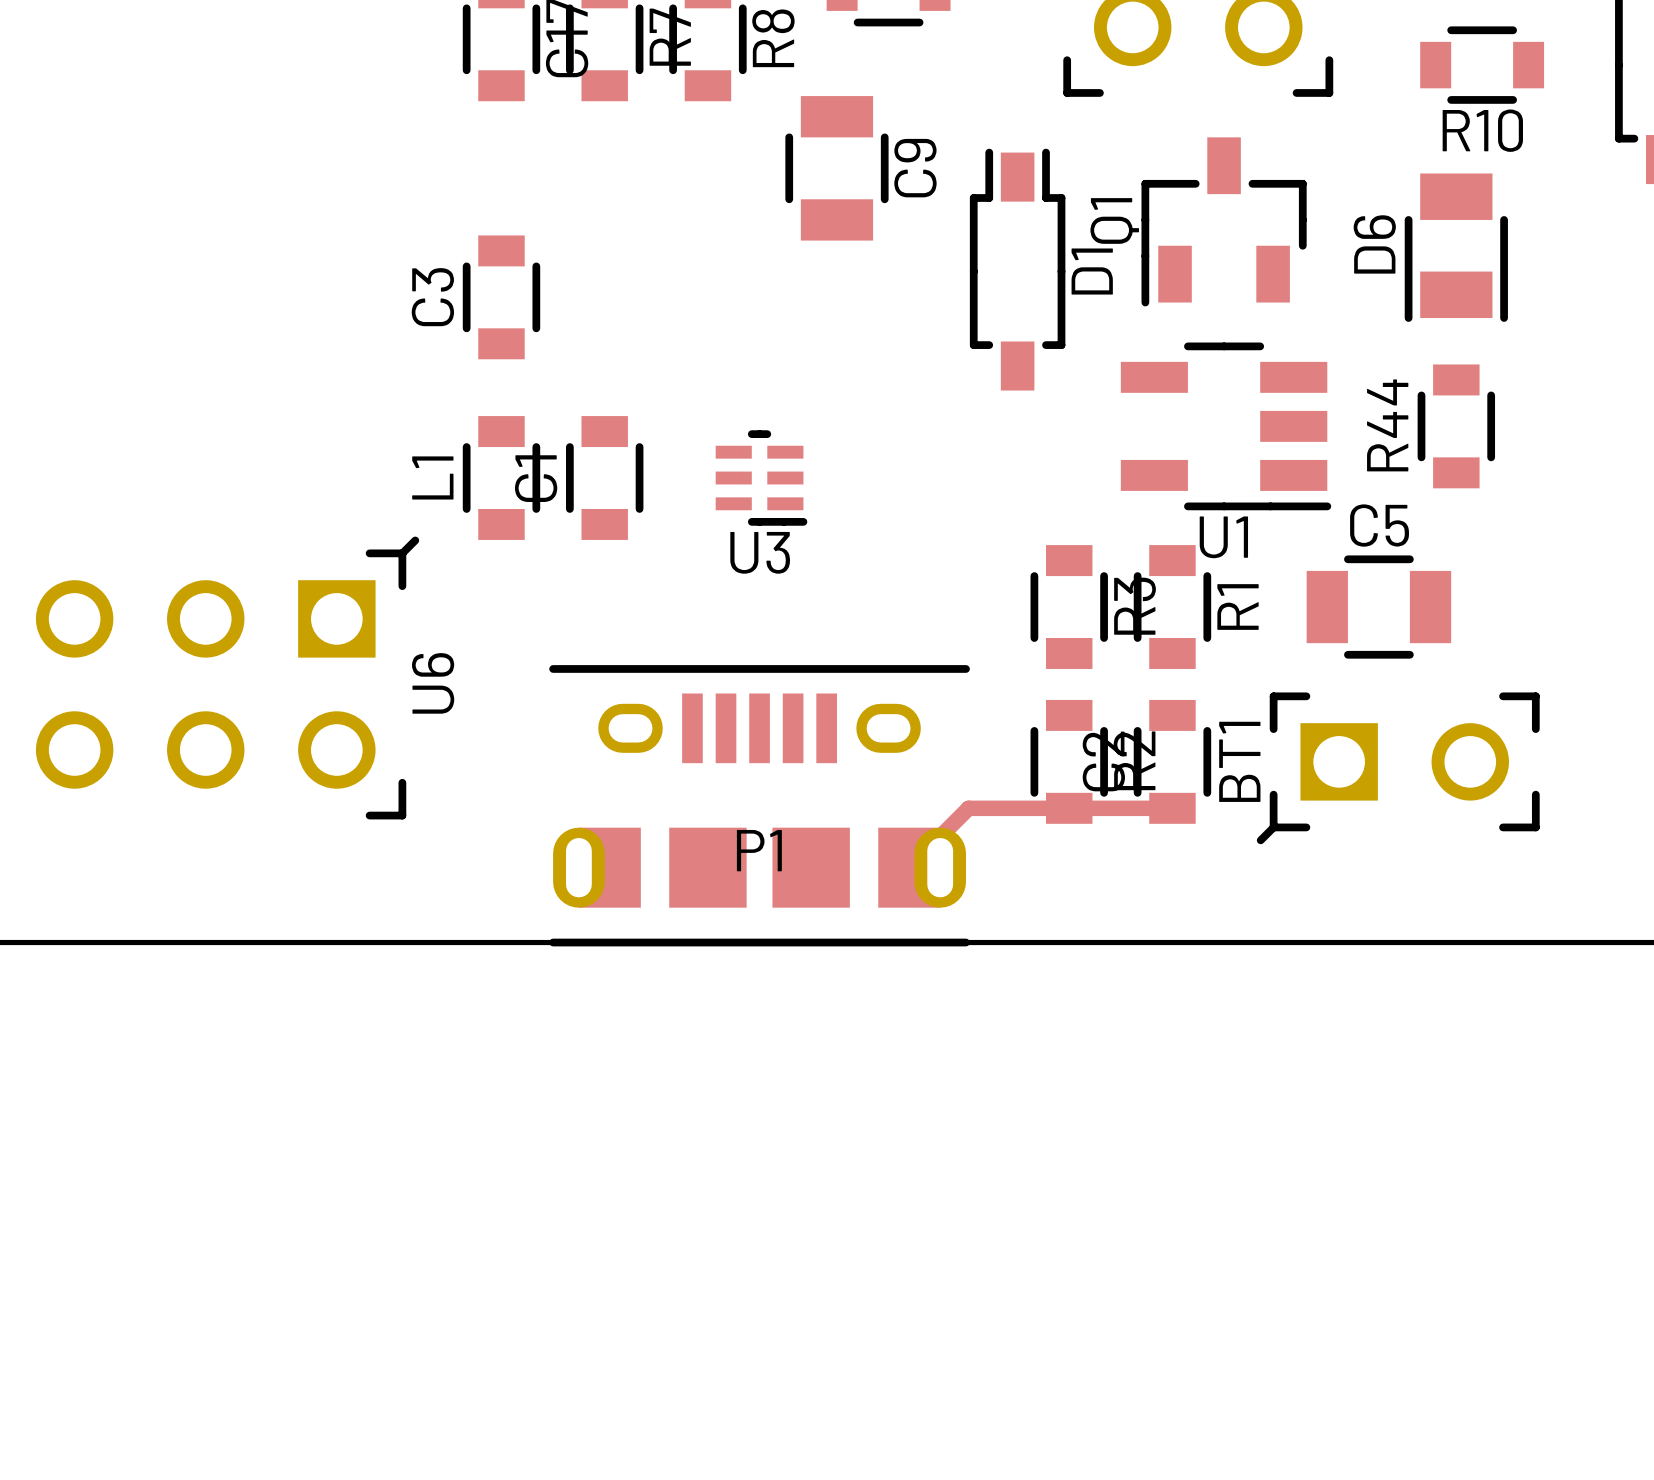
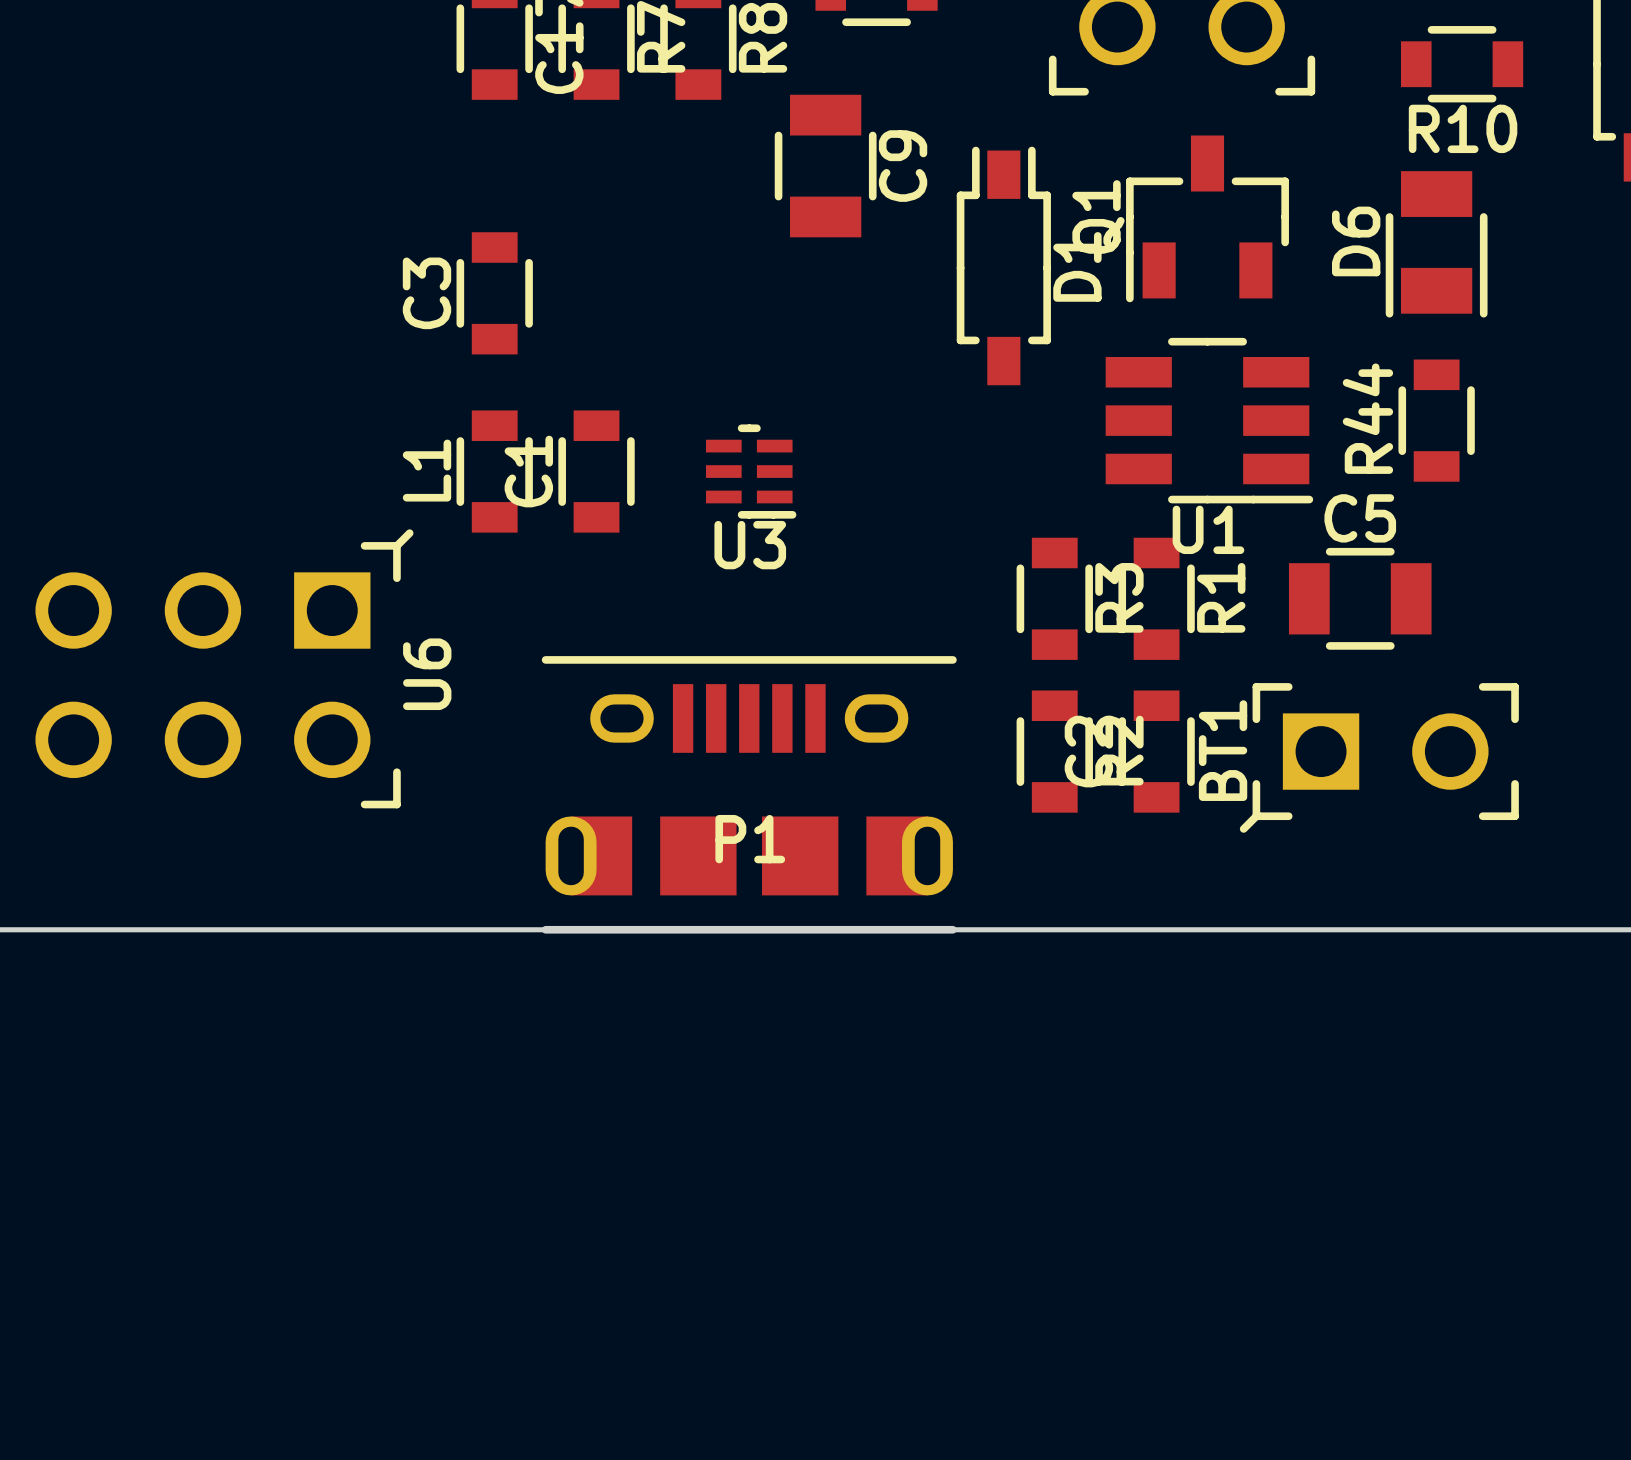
U1 footprint: [1120, 342, 1332, 511] -> [1105, 337, 1314, 504]
track: (1172, 808) (968, 808) (909, 867) -> none

